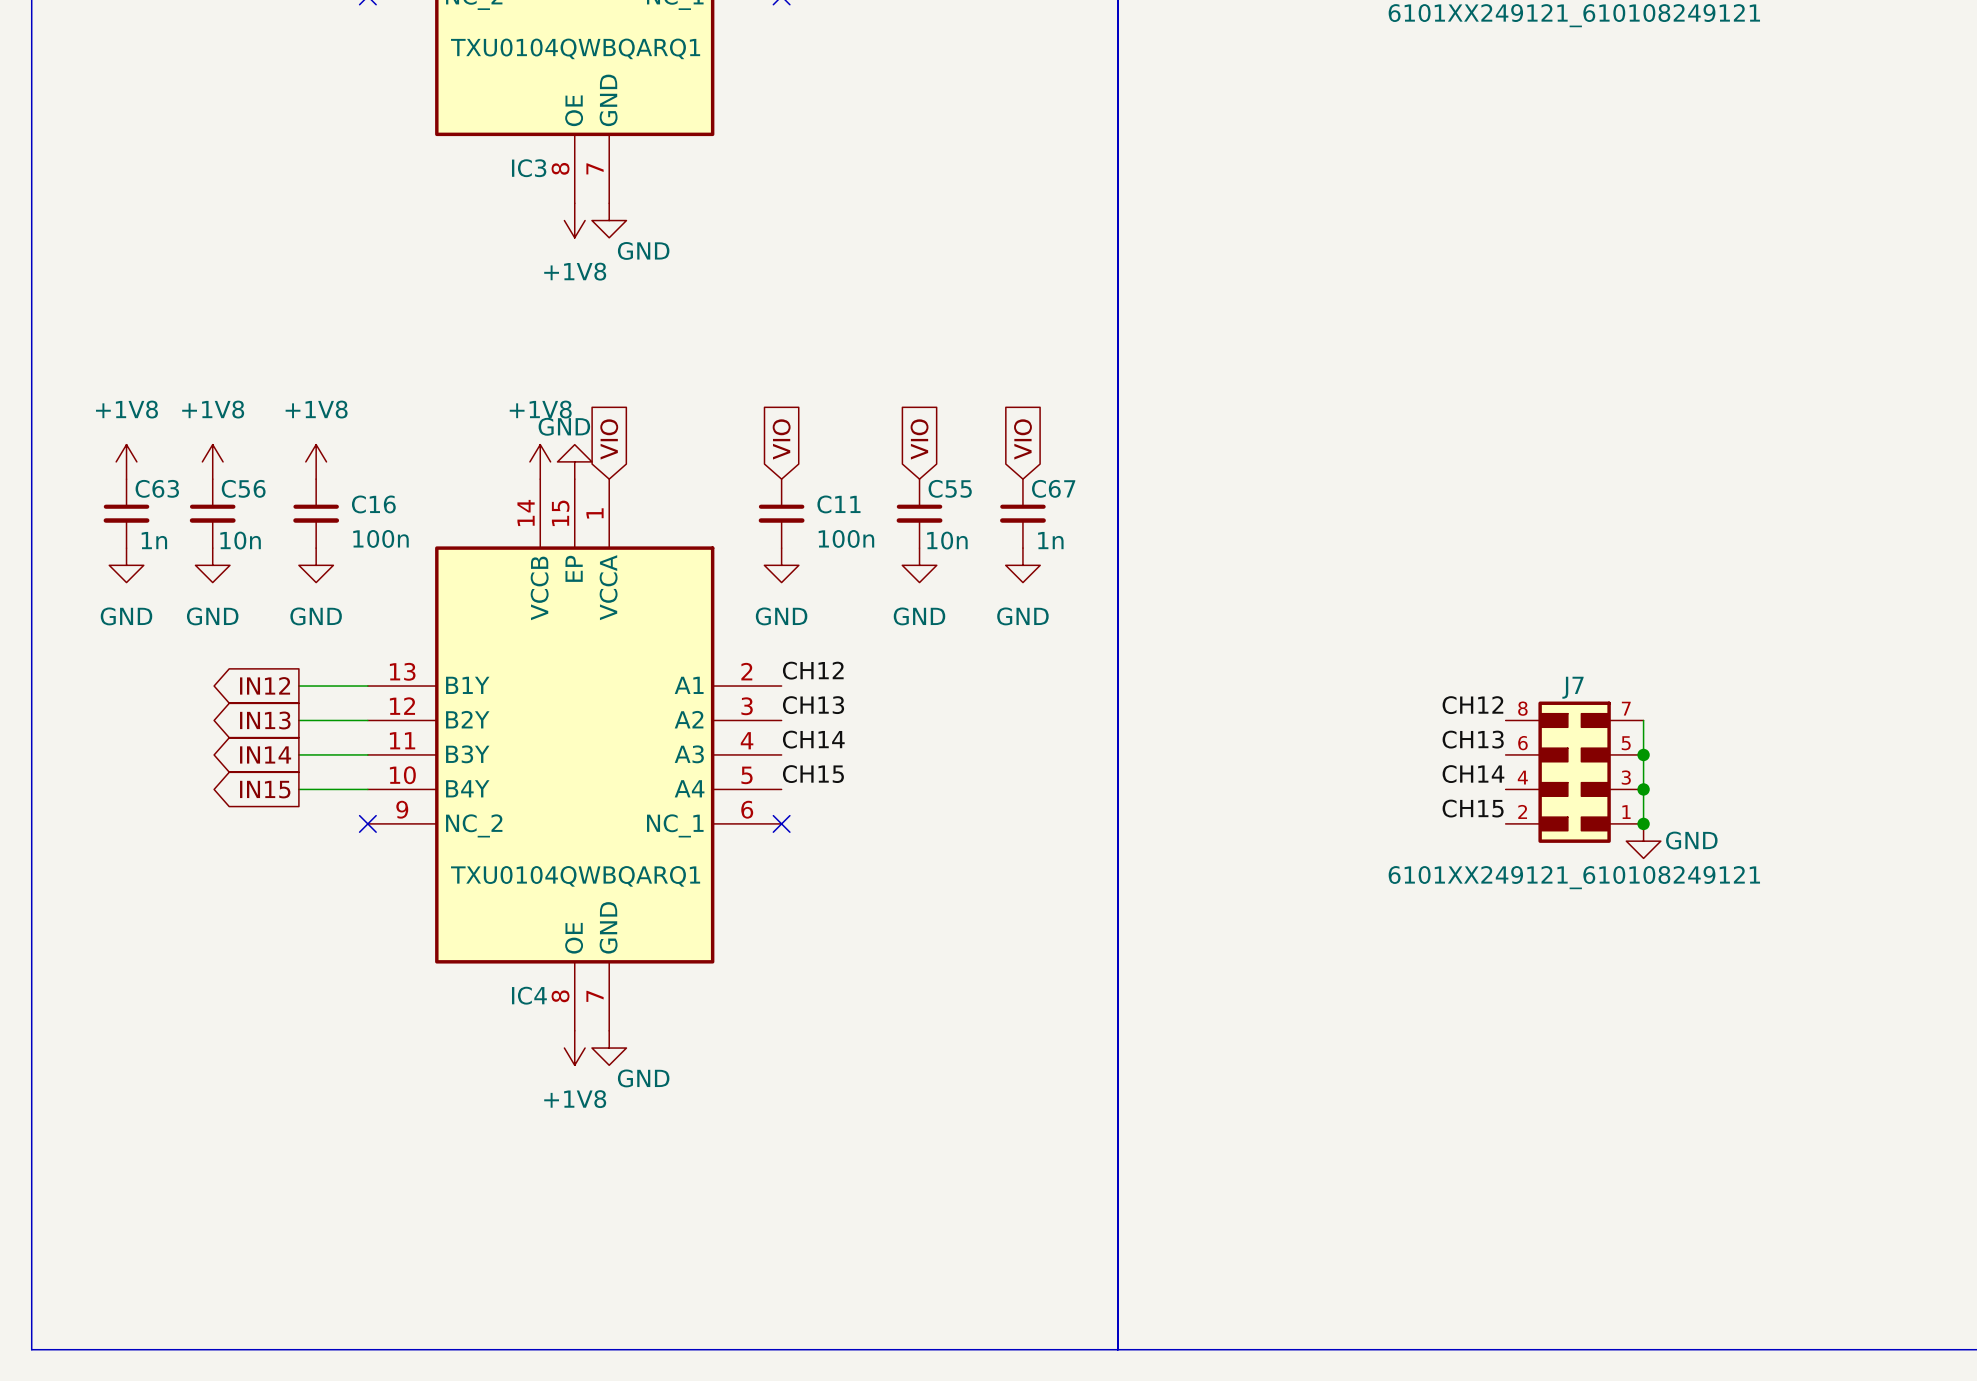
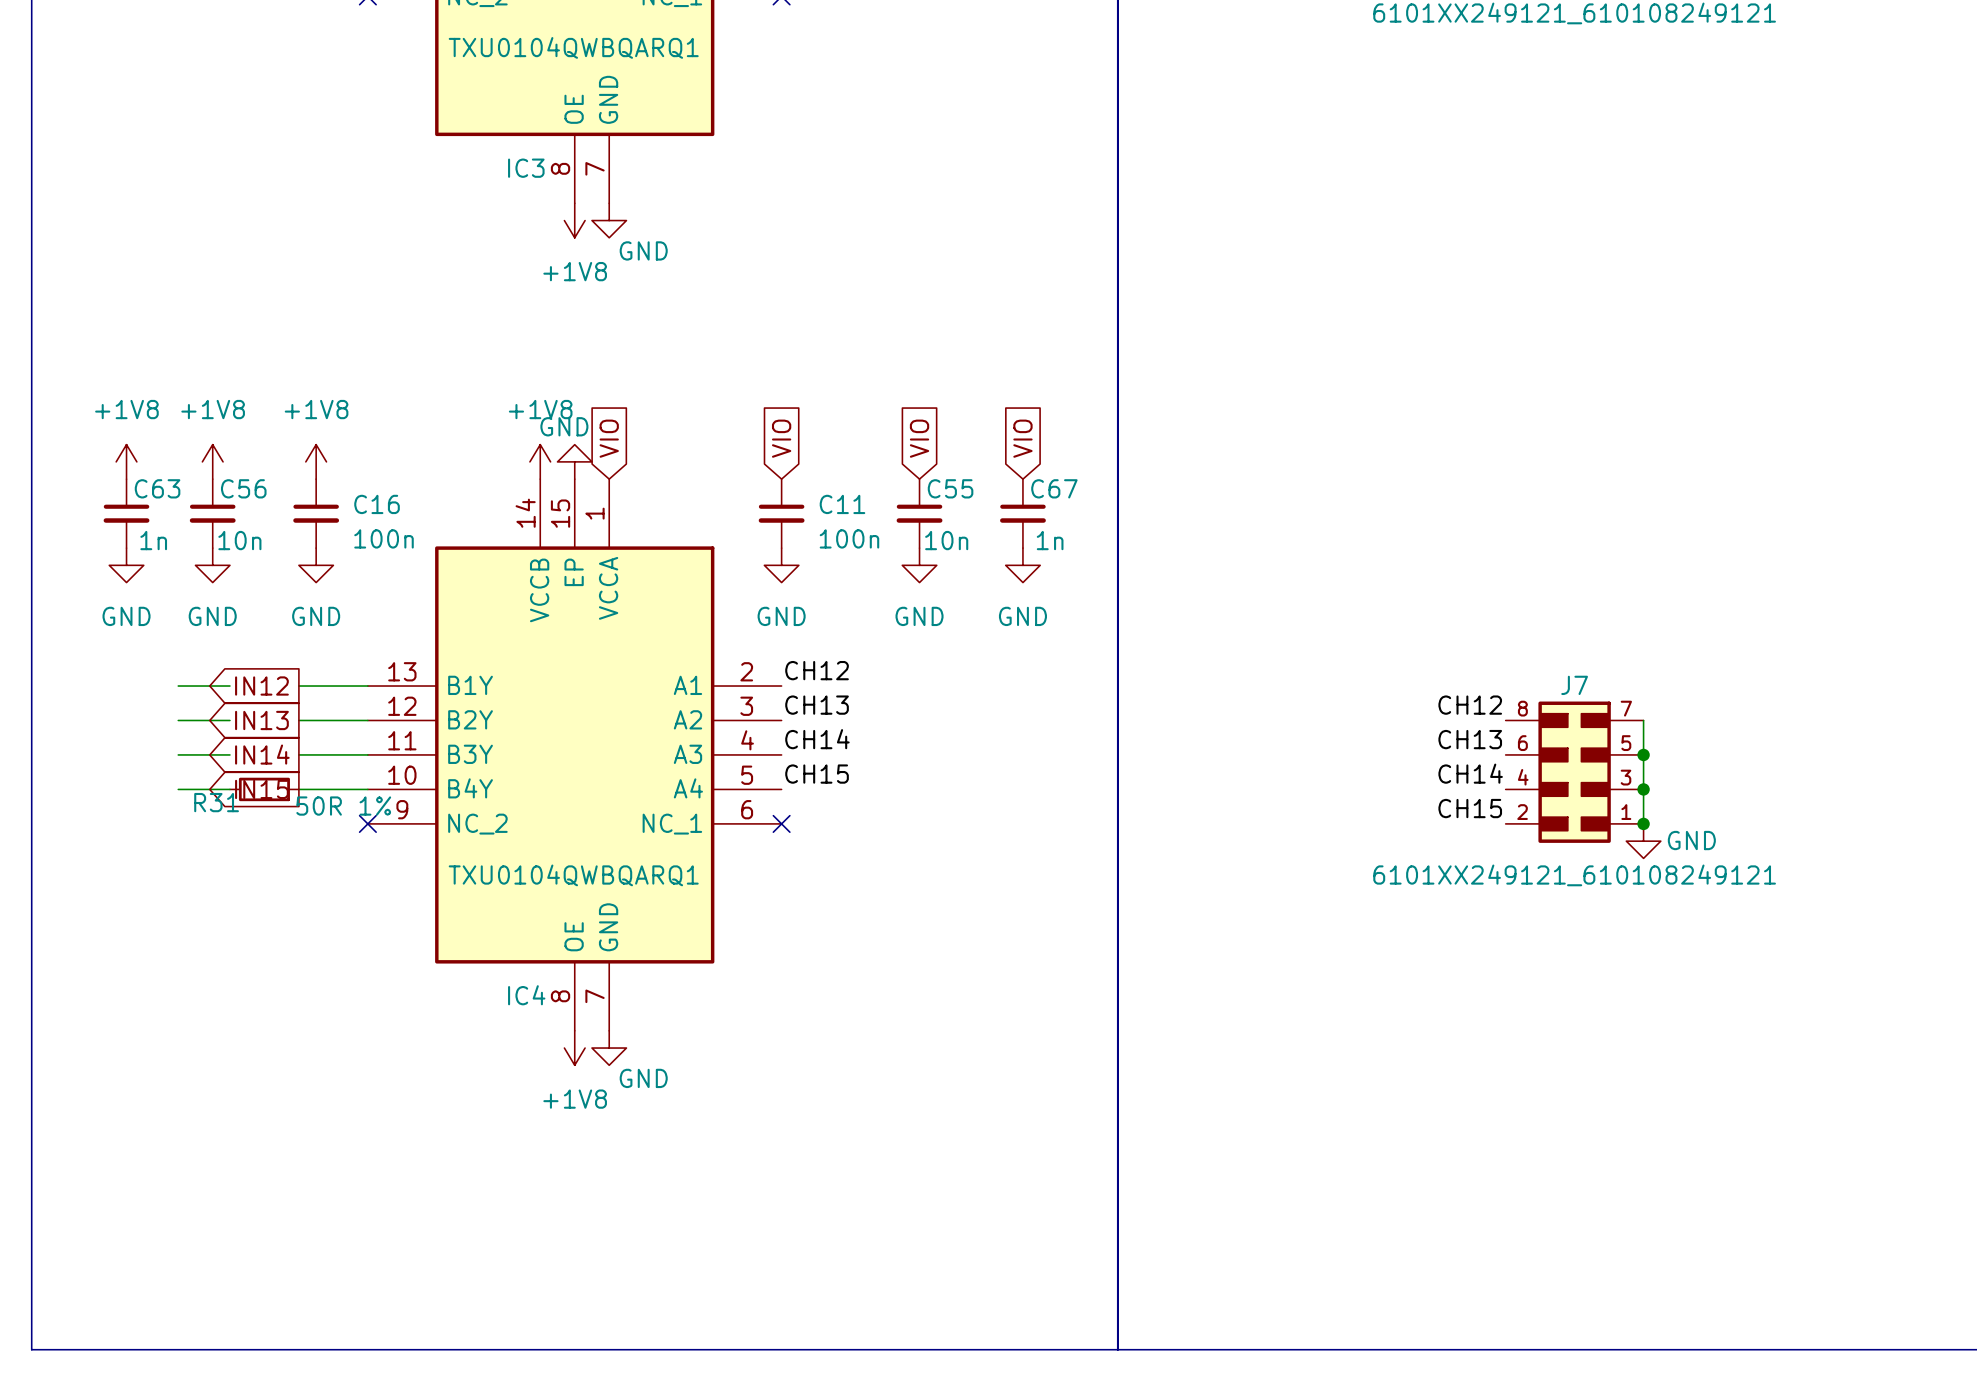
wire: none -> (178, 686) (229, 686)
wire: none -> (178, 720) (229, 720)
wire: none -> (178, 754) (229, 754)
wire: none -> (178, 789) (229, 789)
R31: none -> 50R 1% (264, 789)

